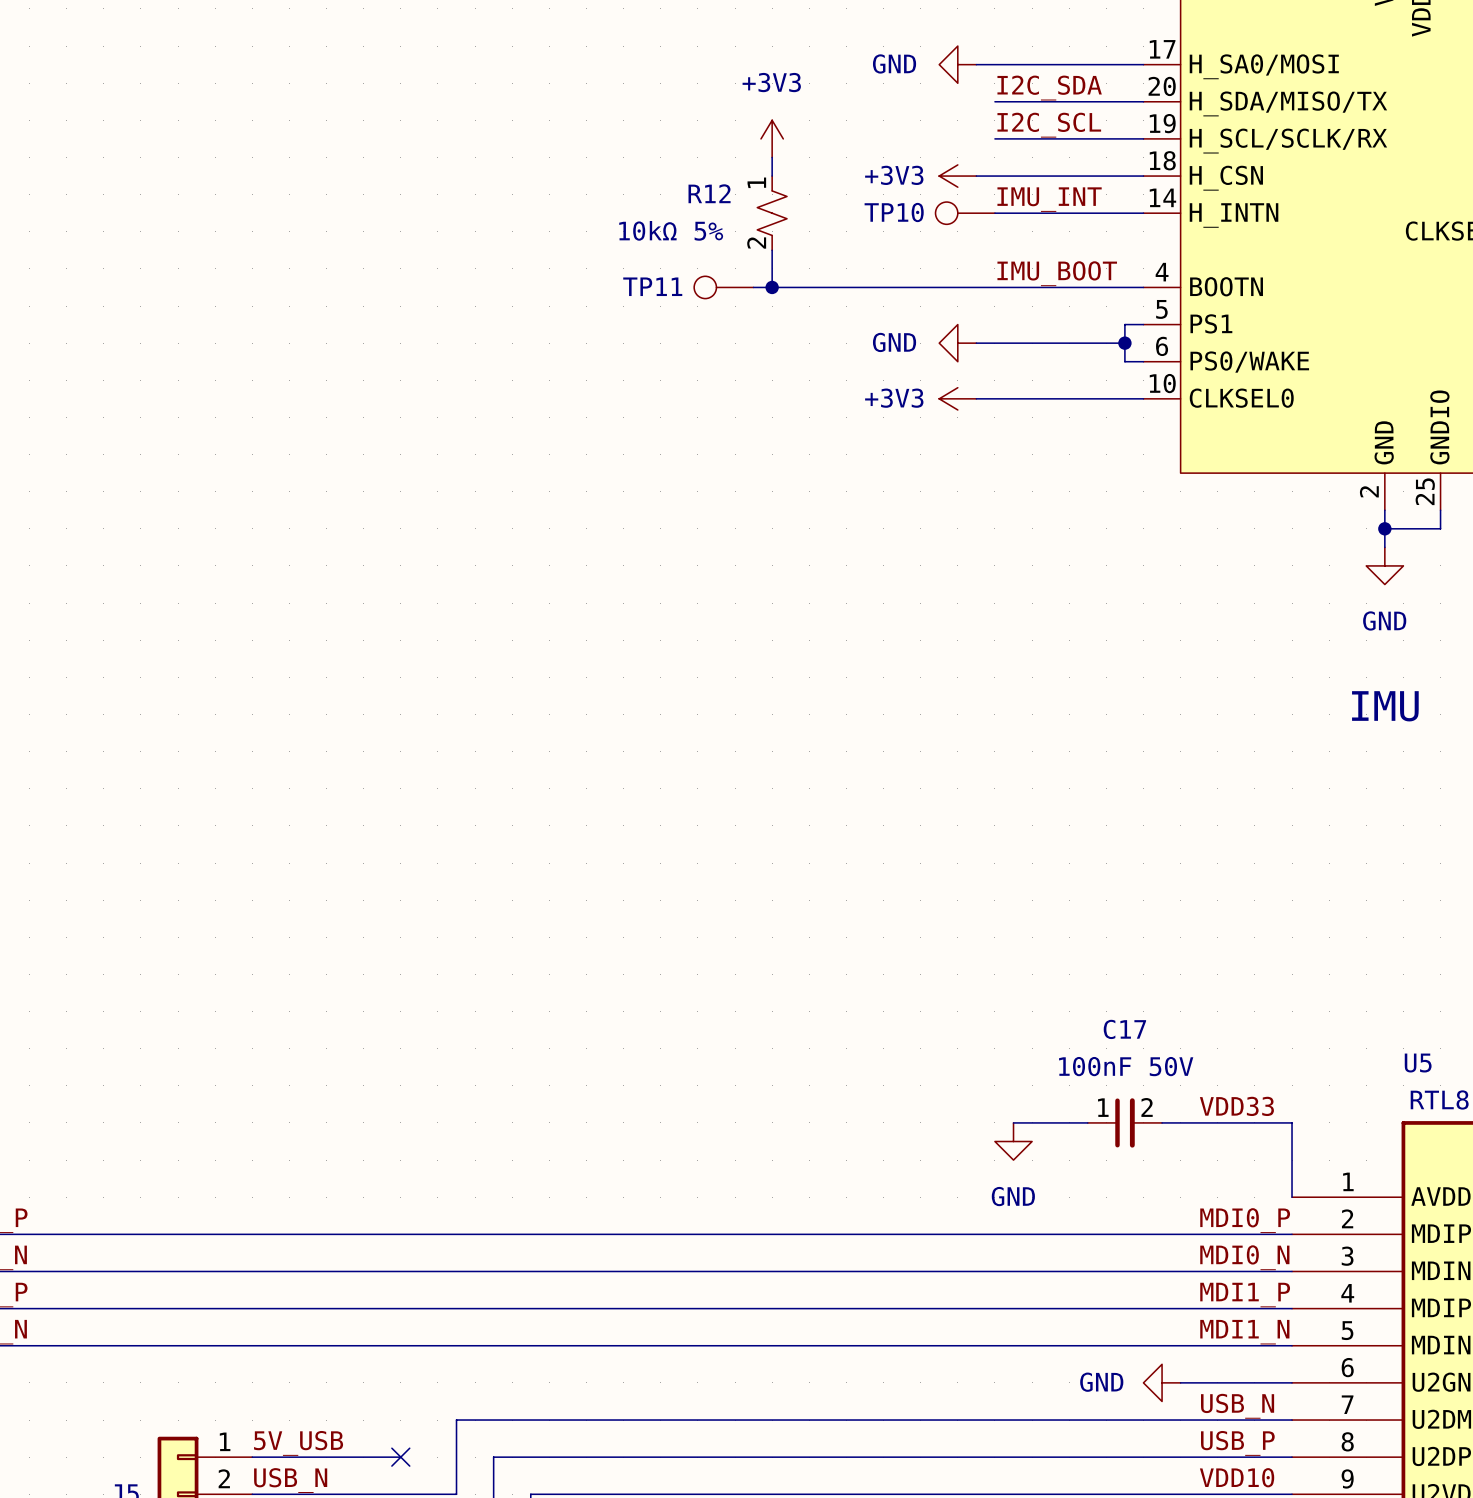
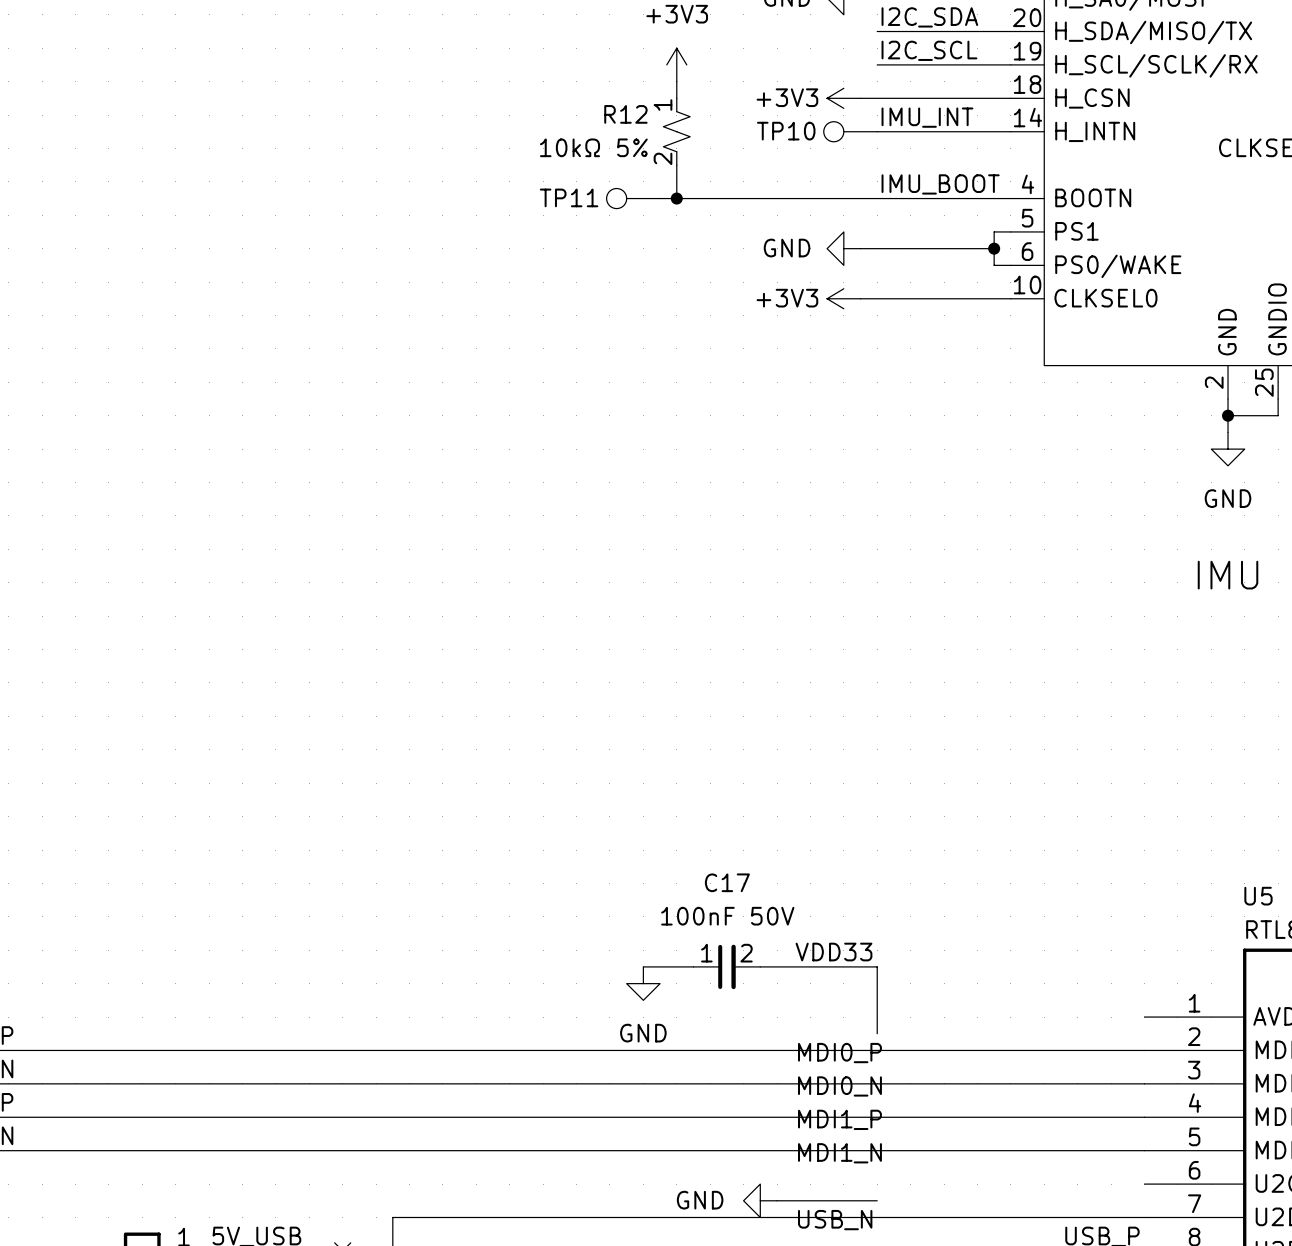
label position: VDD33 (1236, 1106) -> VDD33 (834, 952)
wire: (1013, 1122) (1087, 1122) -> none
C17 position: (1124, 1122) -> (726, 966)
wire: (1162, 1122) (1292, 1122) (1292, 1197) -> (760, 966) (877, 966) (877, 1033)
wire: none -> (643, 966) (693, 966)
power symbol: GND (1013, 1141) -> none
power symbol: none -> GND (643, 983)
label position: MDI0_P (1245, 1220) -> MDI0_P (839, 1053)
label position: MDI0_N (1244, 1257) -> MDI0_N (839, 1086)
label position: MDI1_P (1245, 1295) -> MDI1_P (839, 1119)
label position: MDI1_N (1244, 1332) -> MDI1_N (839, 1153)
power symbol: GND (1162, 1382) -> none
wire: (1180, 1382) (1292, 1382) -> (777, 1200) (877, 1200)
power symbol: none -> GND (760, 1200)
label position: USB_N (1237, 1406) -> USB_N (835, 1220)

